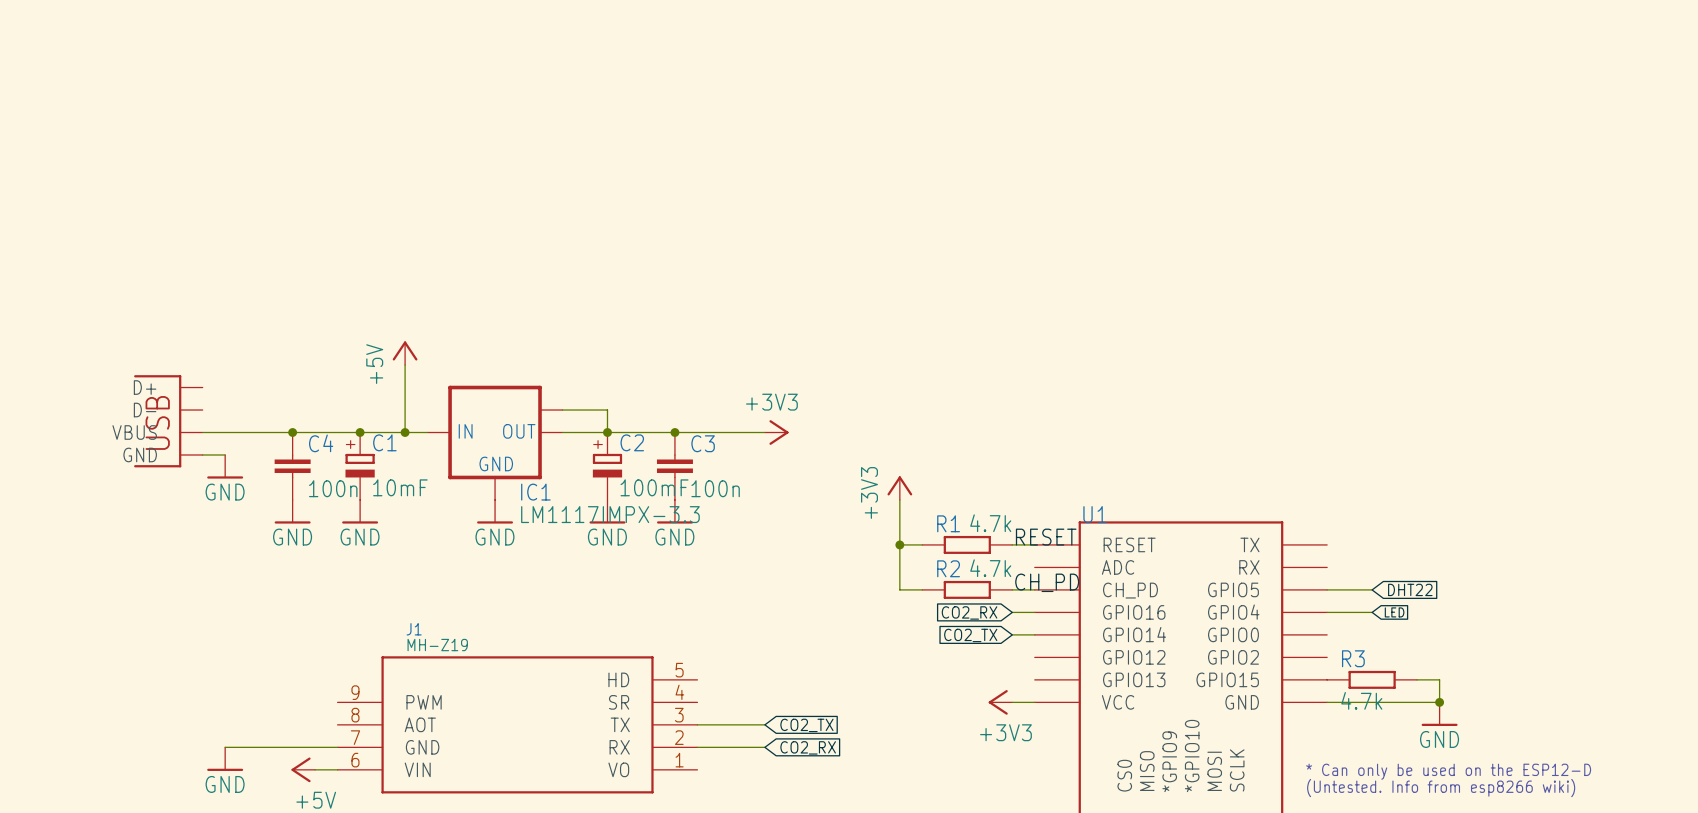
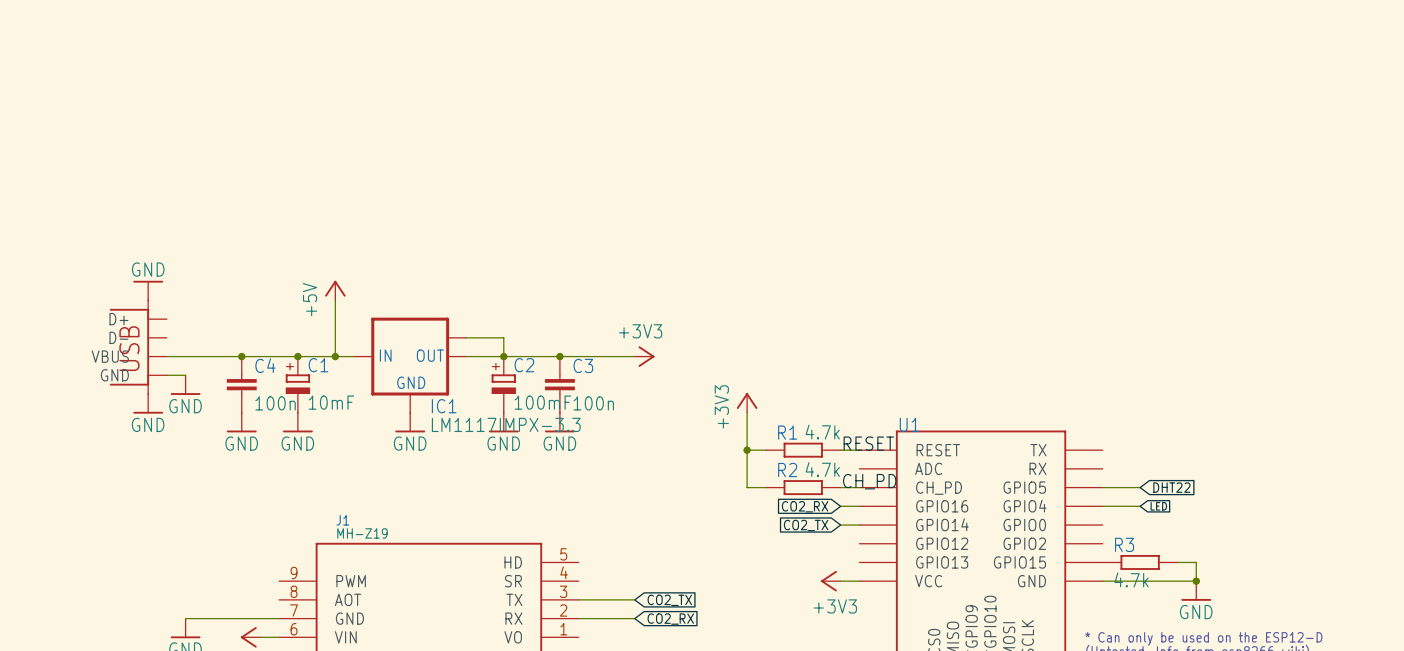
power symbol: none -> GND (148, 290)
part symbol: [134, 375, 203, 468] -> [109, 300, 167, 395]
power symbol: none -> GND (148, 403)

